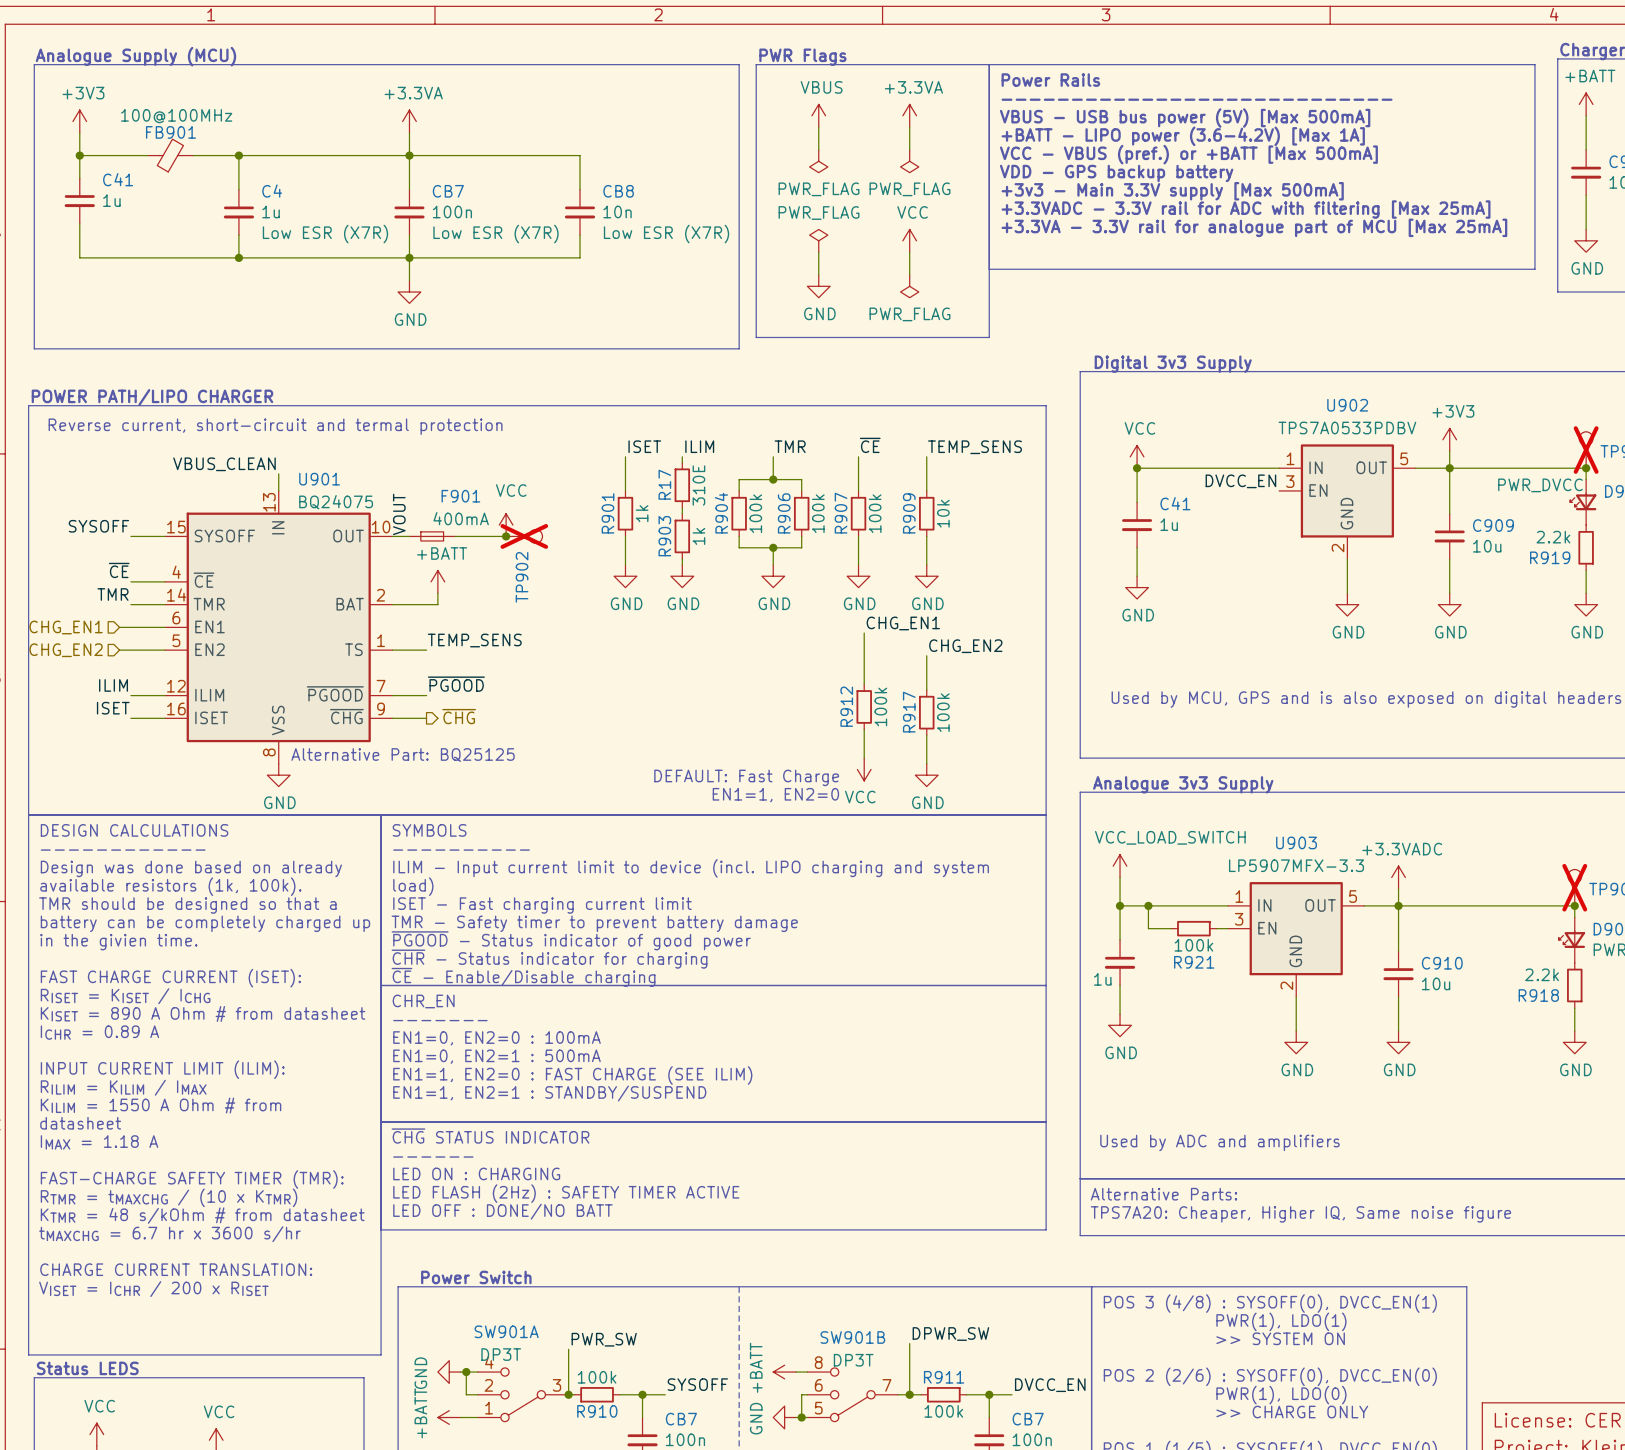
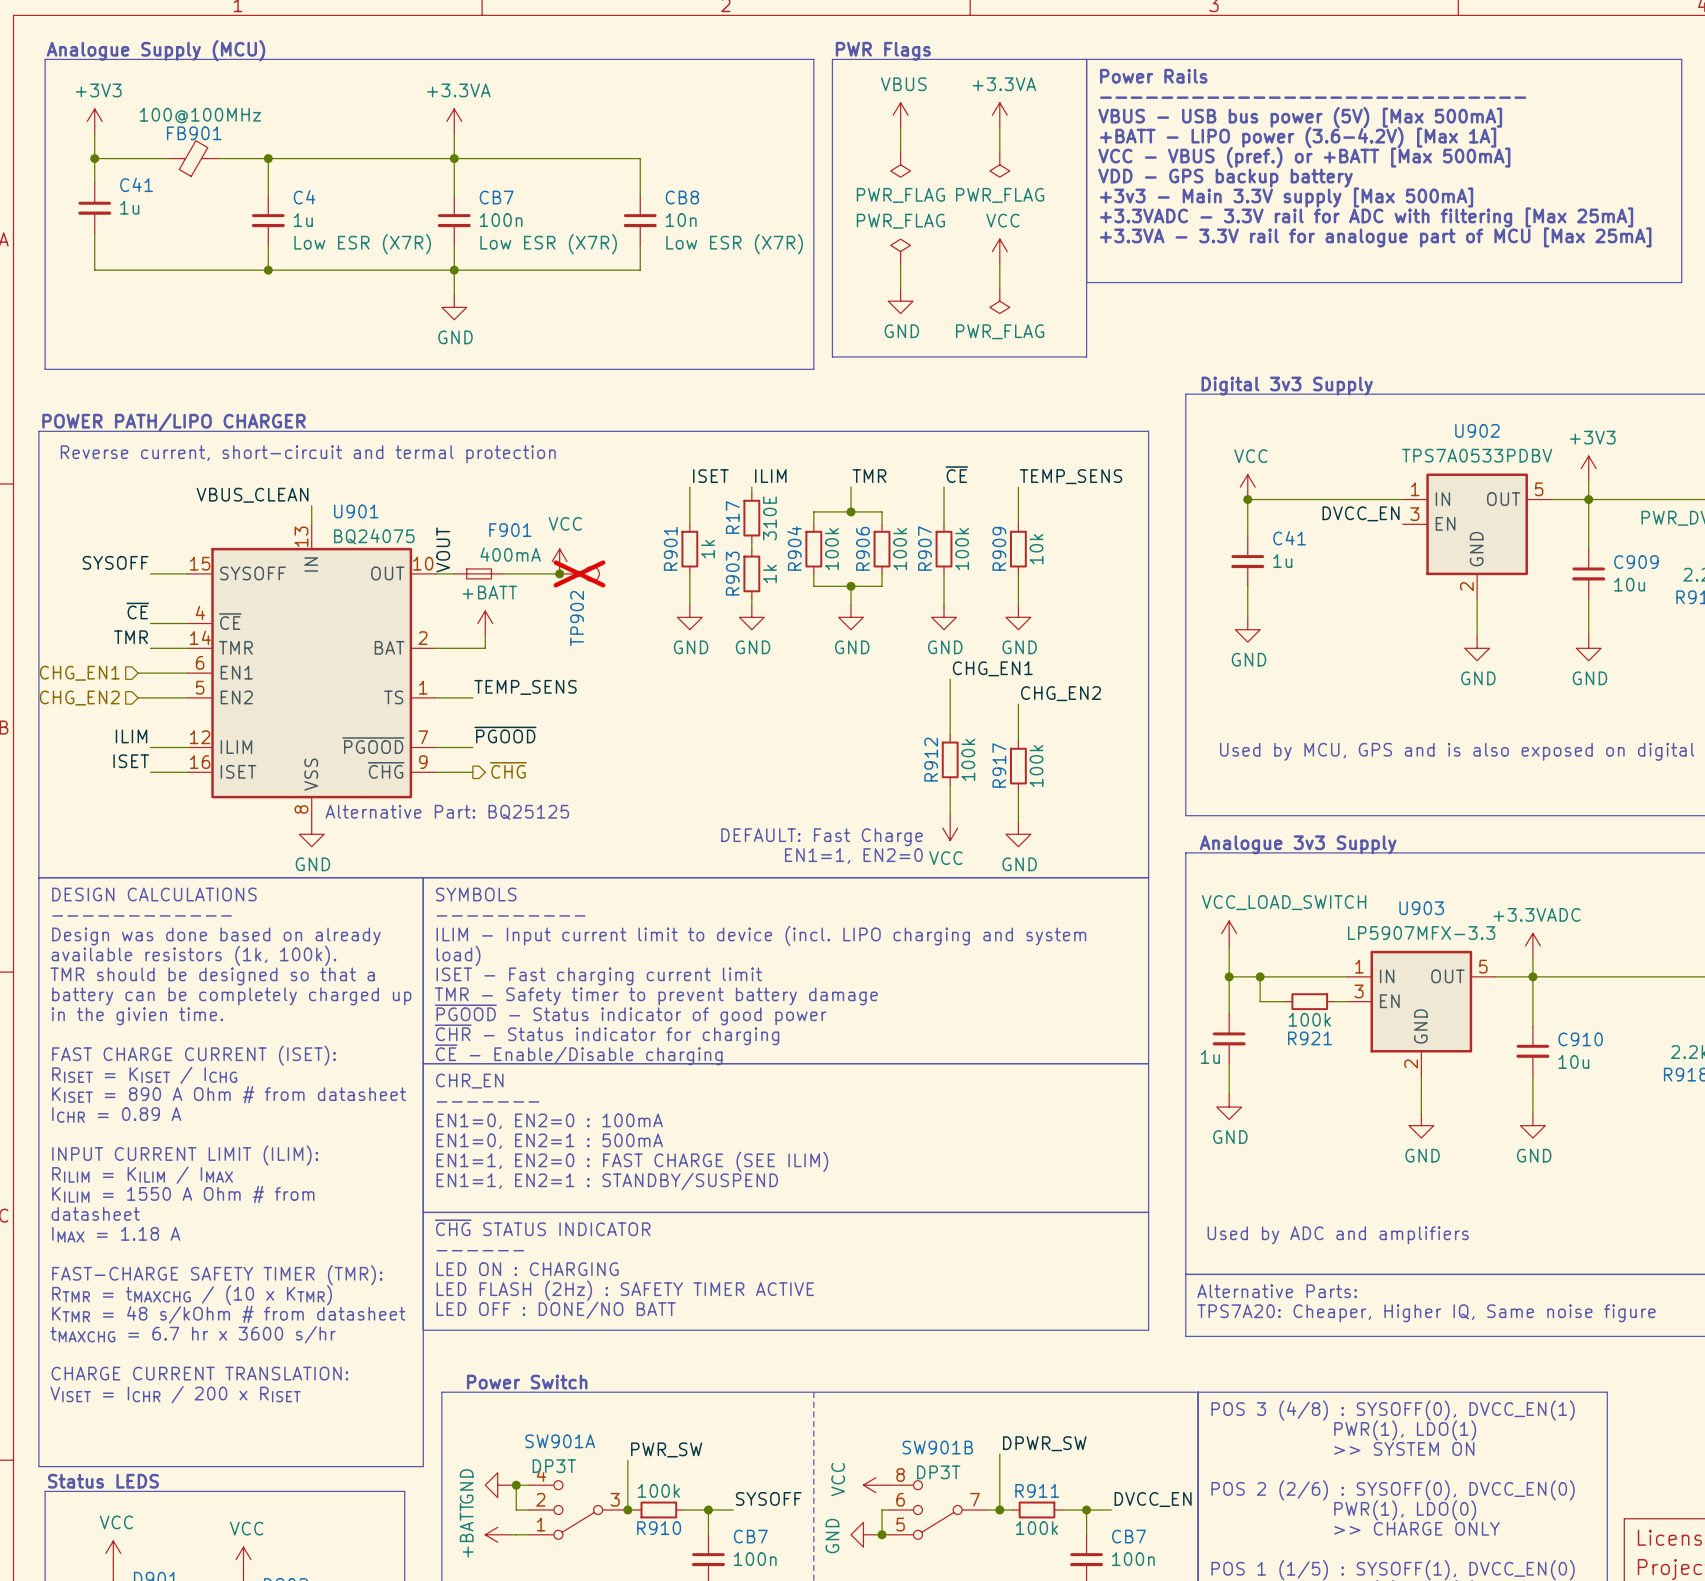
power symbol: +BATT (784, 1372) -> none
power symbol: none -> VCC (875, 1485)

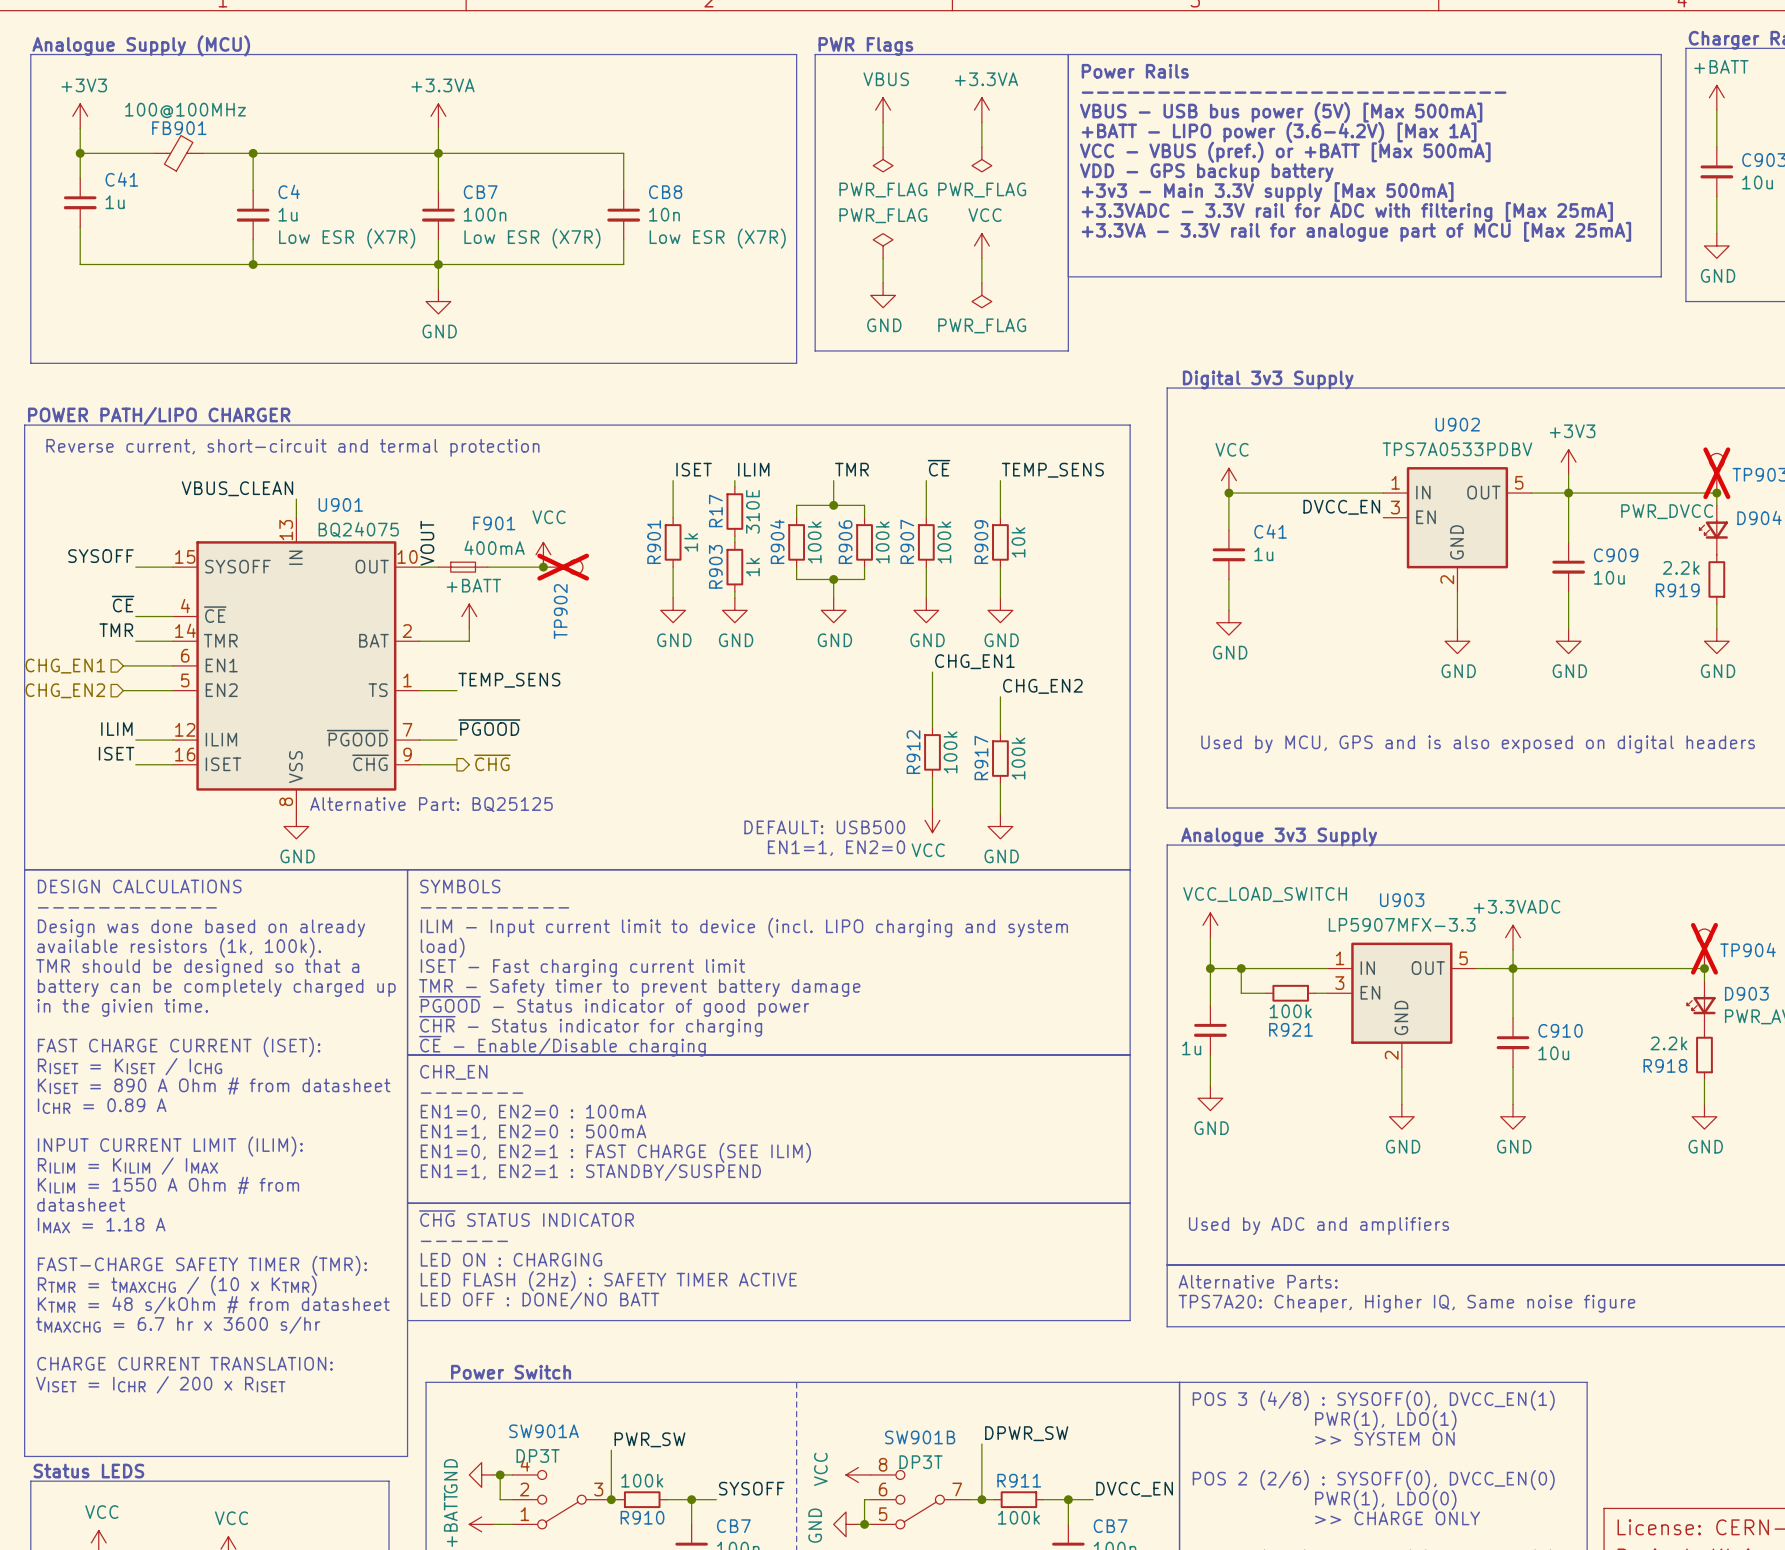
text: DEFAULT: Fast Charge (822, 837) -> DEFAULT: USB500 (824, 827)
text: EN1=0, EN2=1 : 500mA (549, 1141) -> EN1=1, EN2=0 : 500mA (533, 1132)
text: EN1=1, EN2=0 : FAST CHARGE (SEE ILIM) (632, 1161) -> EN1=0, EN2=1 : FAST CHARGE (SEE ILIM) (615, 1152)

